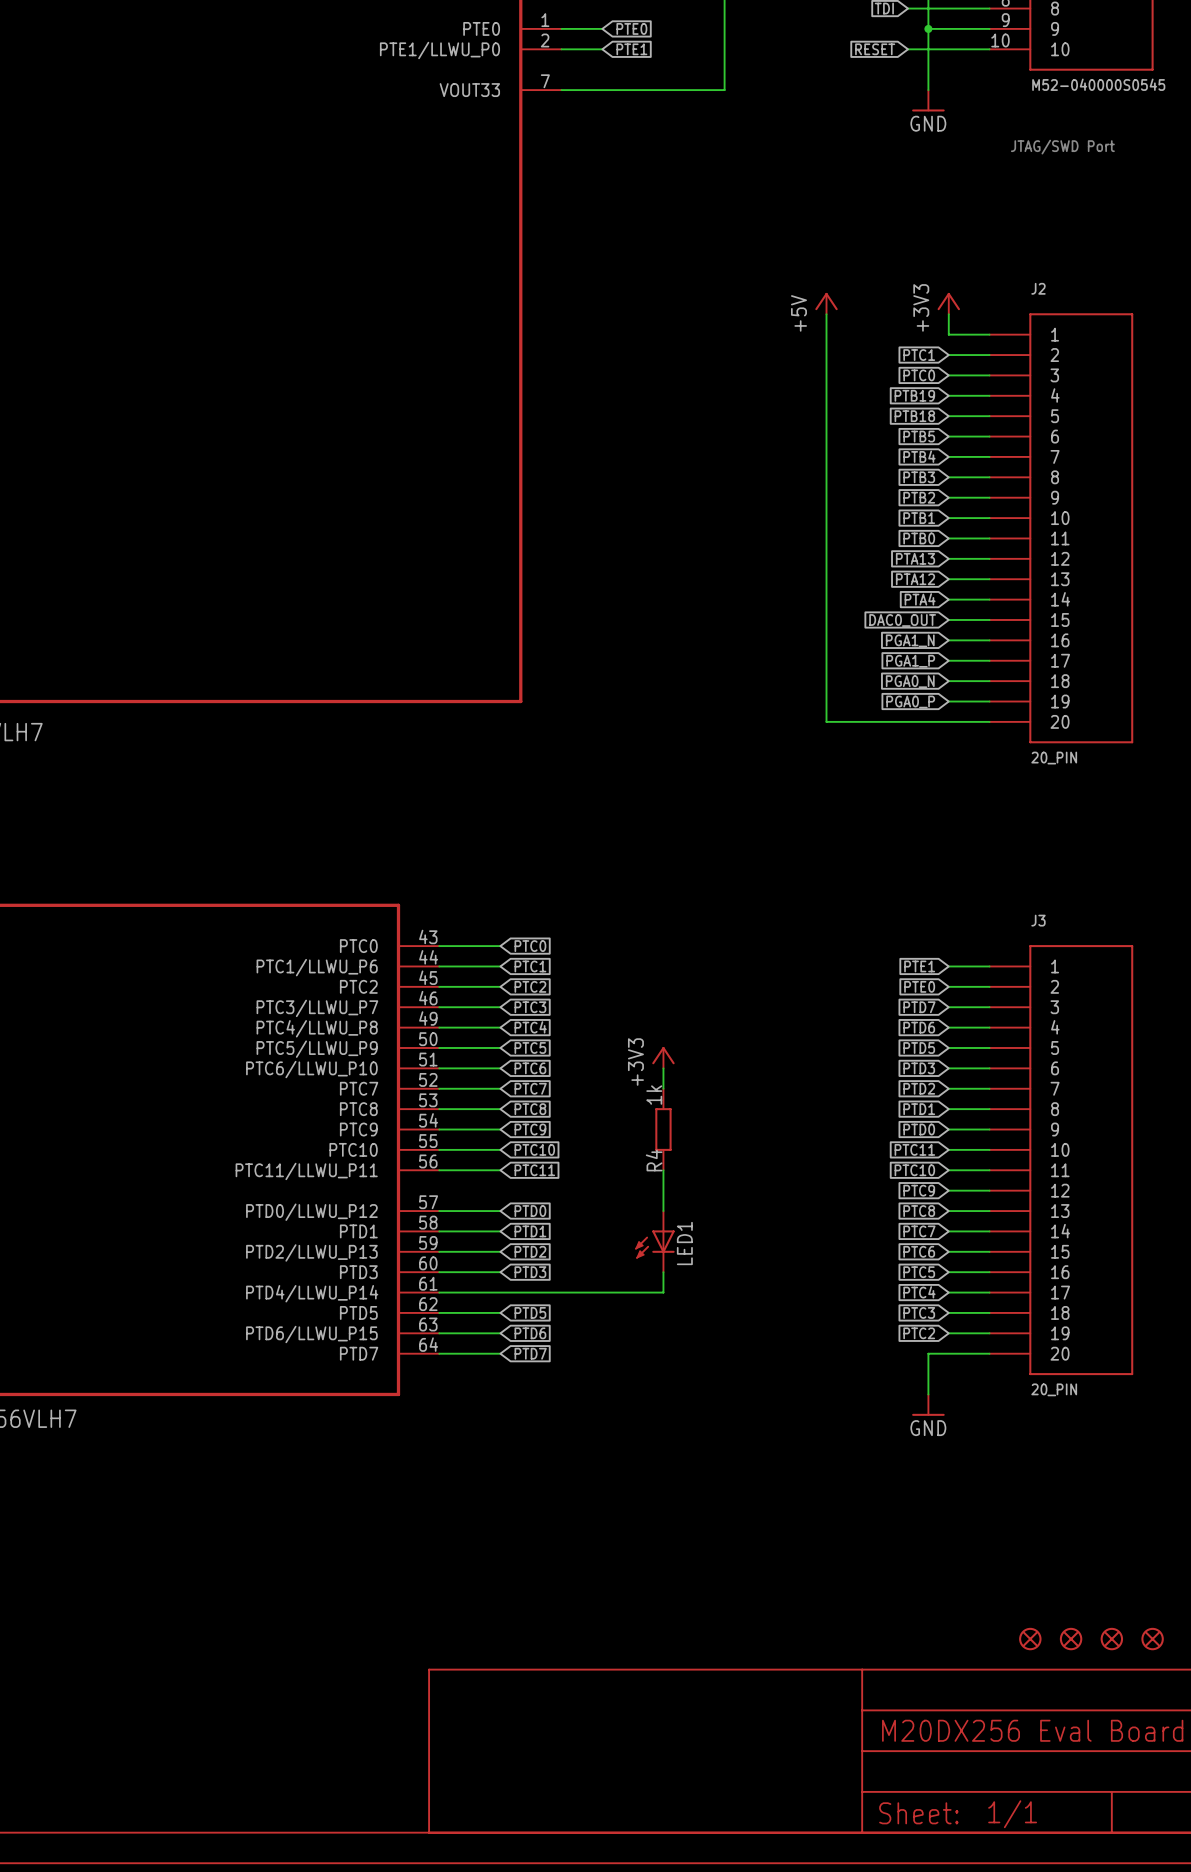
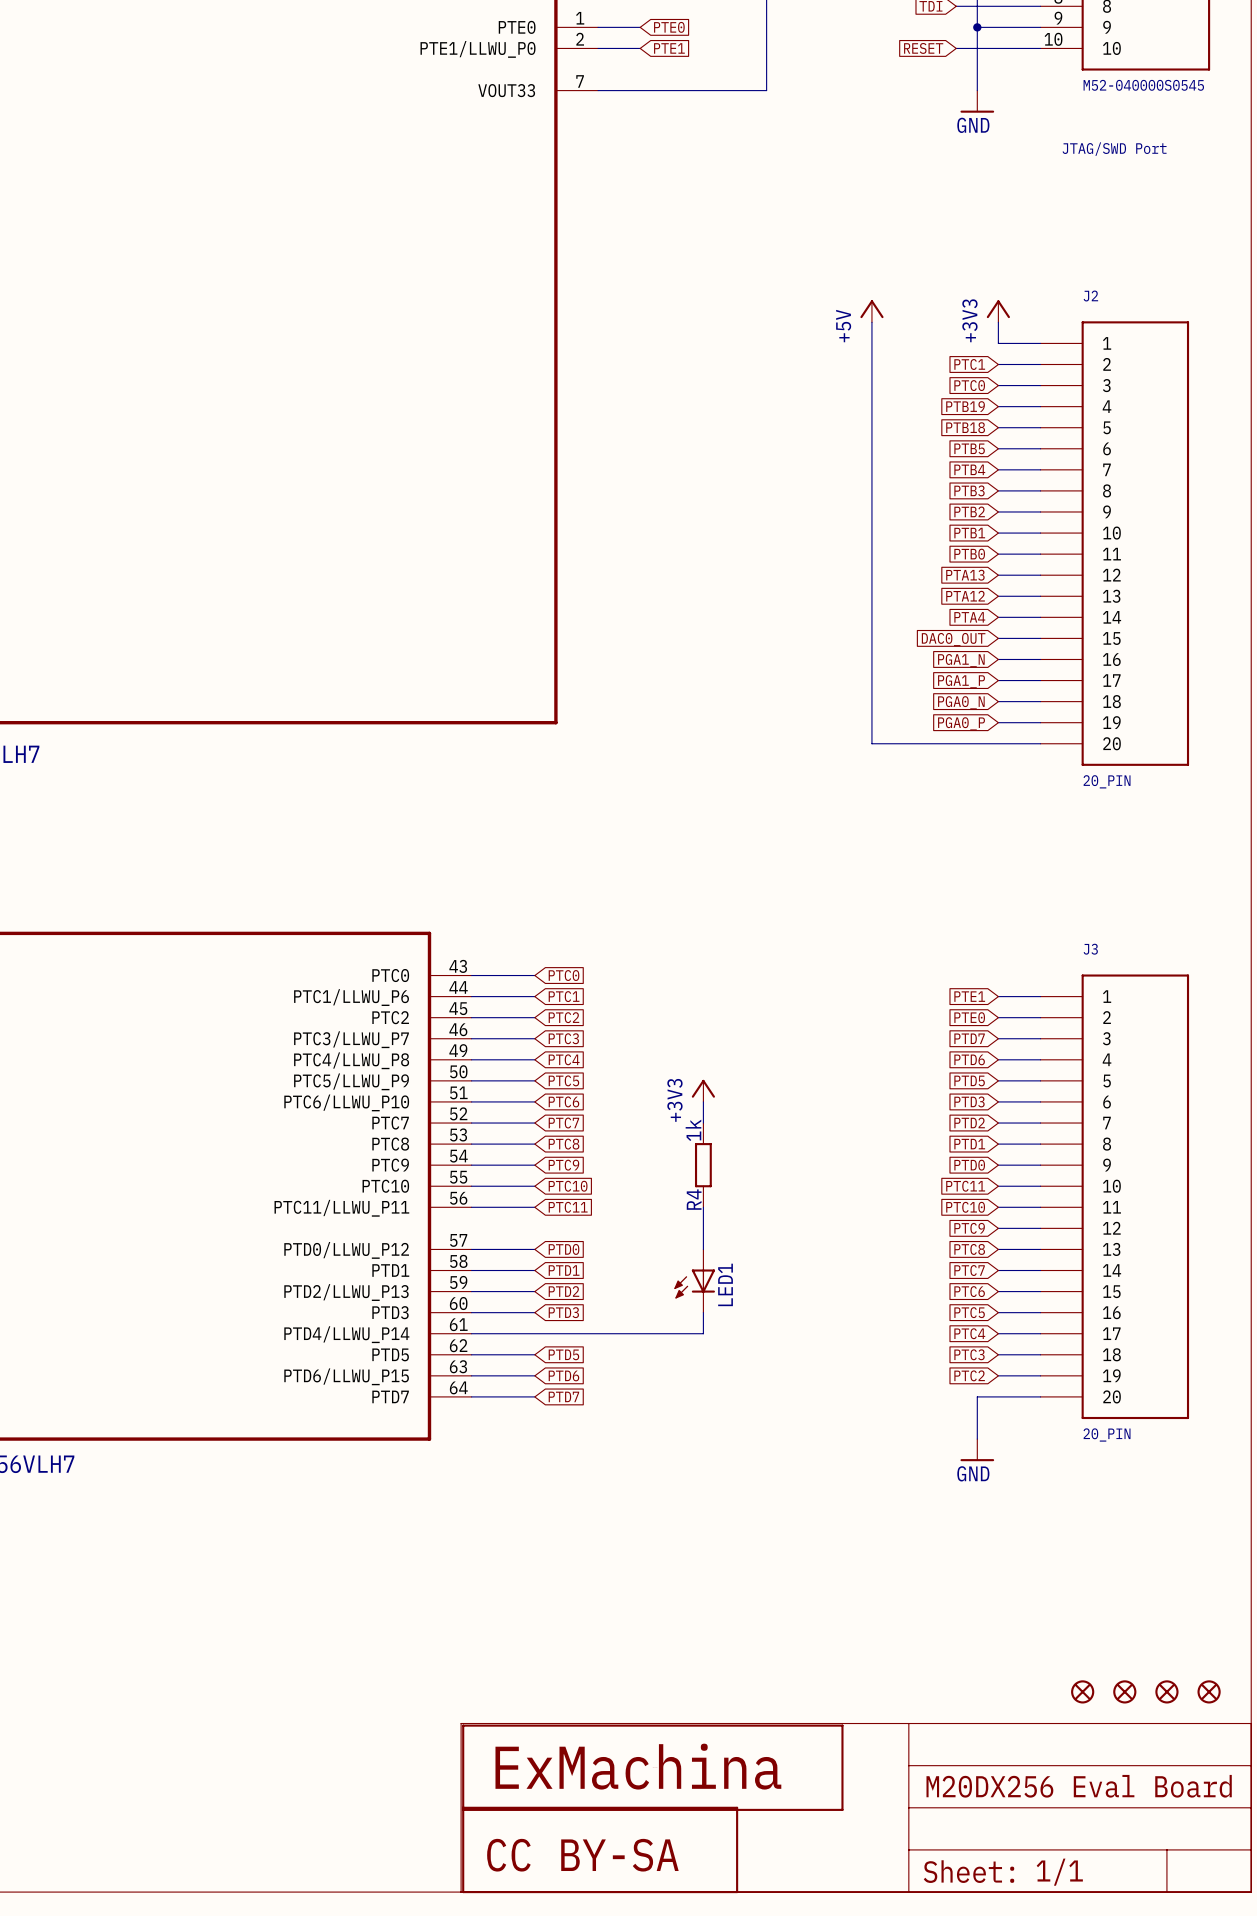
part: none -> (652, 1767)
part: none -> (600, 1849)

